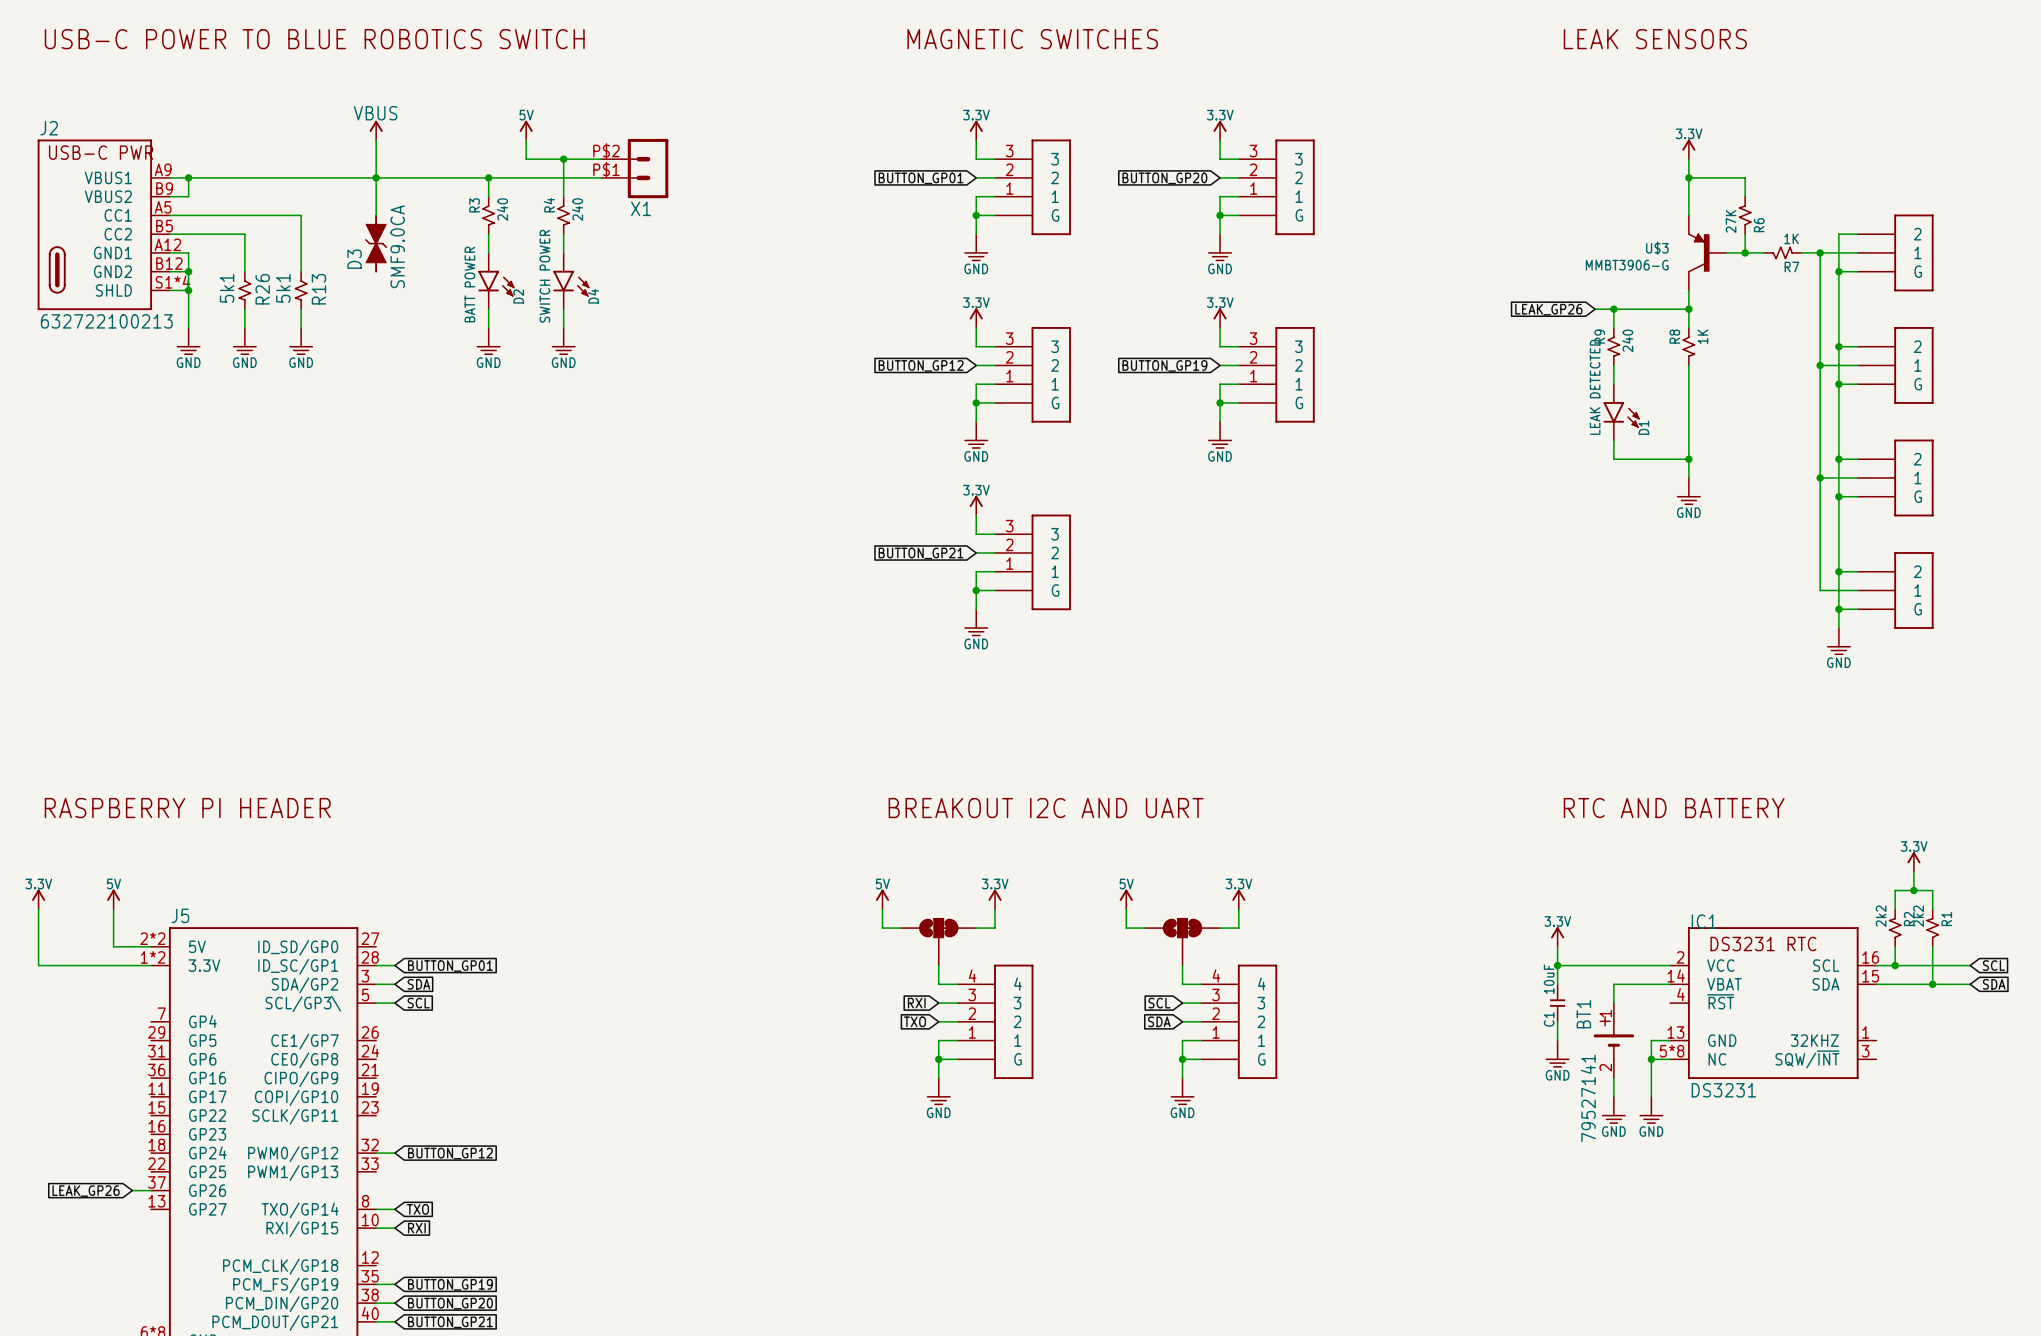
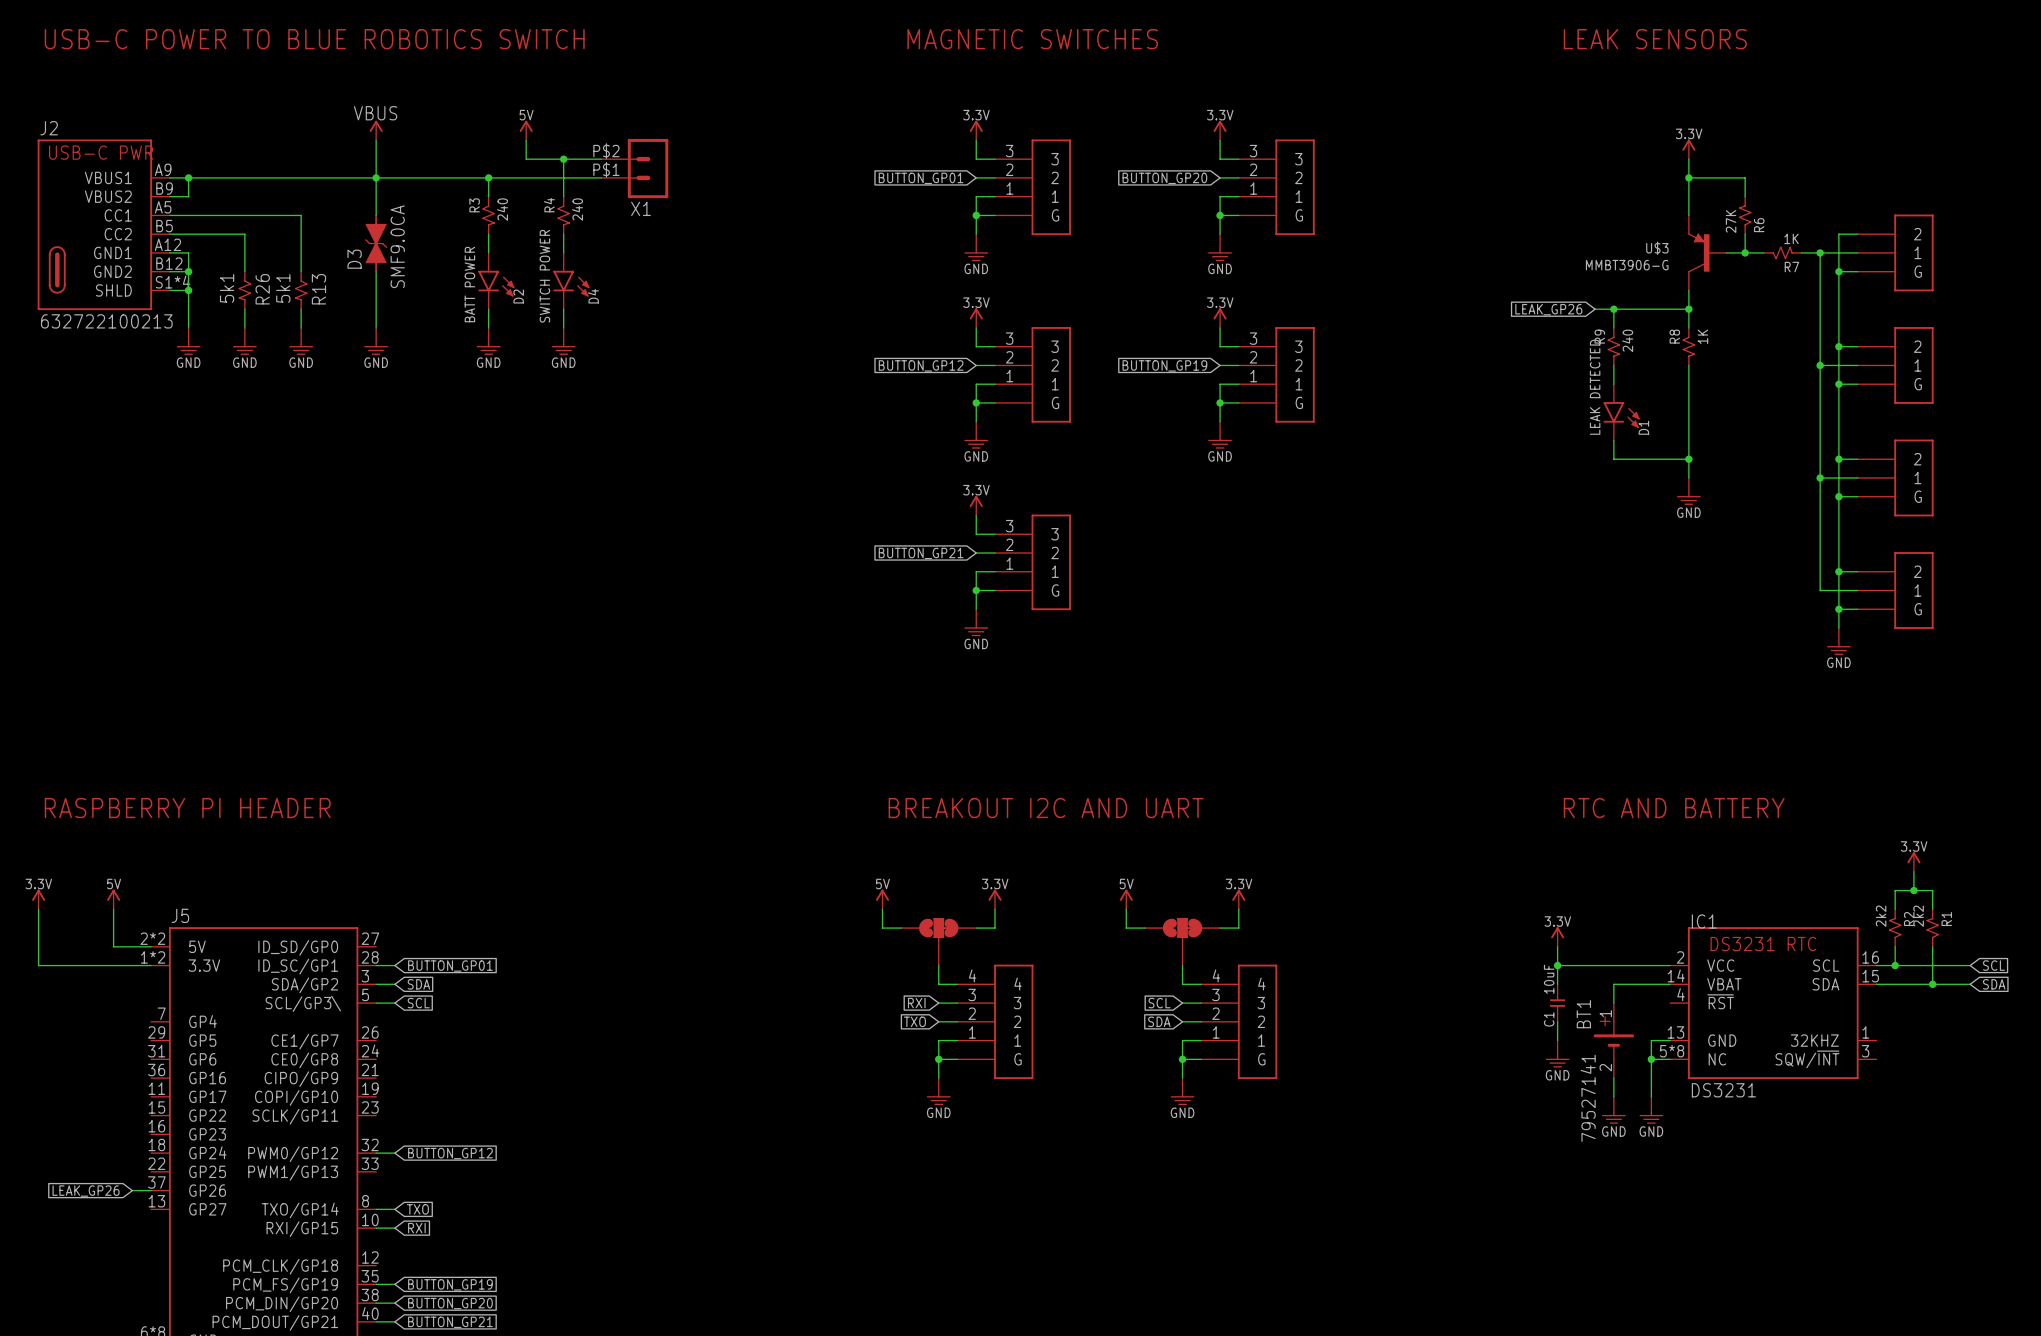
wire: none -> (376, 271) (376, 327)
power symbol: none -> GND (376, 341)

